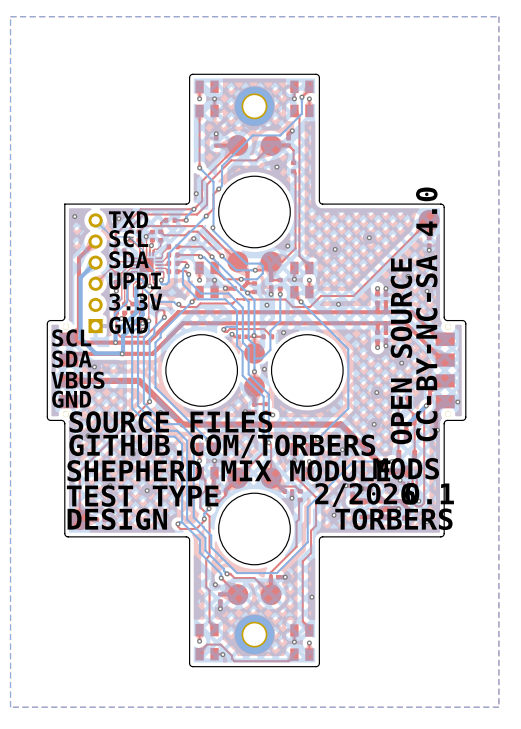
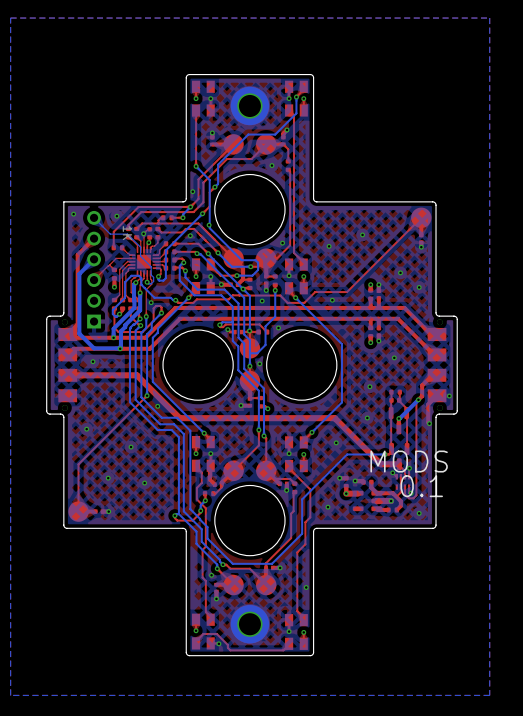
text: TXD (128, 219) -> none
text: SCL (128, 238) -> none
text: SDA (129, 259) -> none
text: UPDI (135, 281) -> none
text: 3.3V (135, 302) -> none
text: CC-BY-NC-SA 4.0 (426, 314) -> none
text: GND (128, 325) -> none
text: SCL (71, 337) -> none
text: OPEN SOURCE (401, 351) -> none
text: SDA (72, 359) -> none
text: VBUS (77, 380) -> none
text: GND (71, 399) -> none
text: SOURCE FILES (170, 422) -> none
text: GITHUB.COM/TORBERS (222, 446) -> none
text: SHEPHERD MIX MODULE (228, 470) -> none
text: 2/2026 (365, 495) -> none
text: TEST TYPE (142, 496) -> none
text: DESIGN (117, 519) -> none
text: TORBERS (393, 519) -> none

